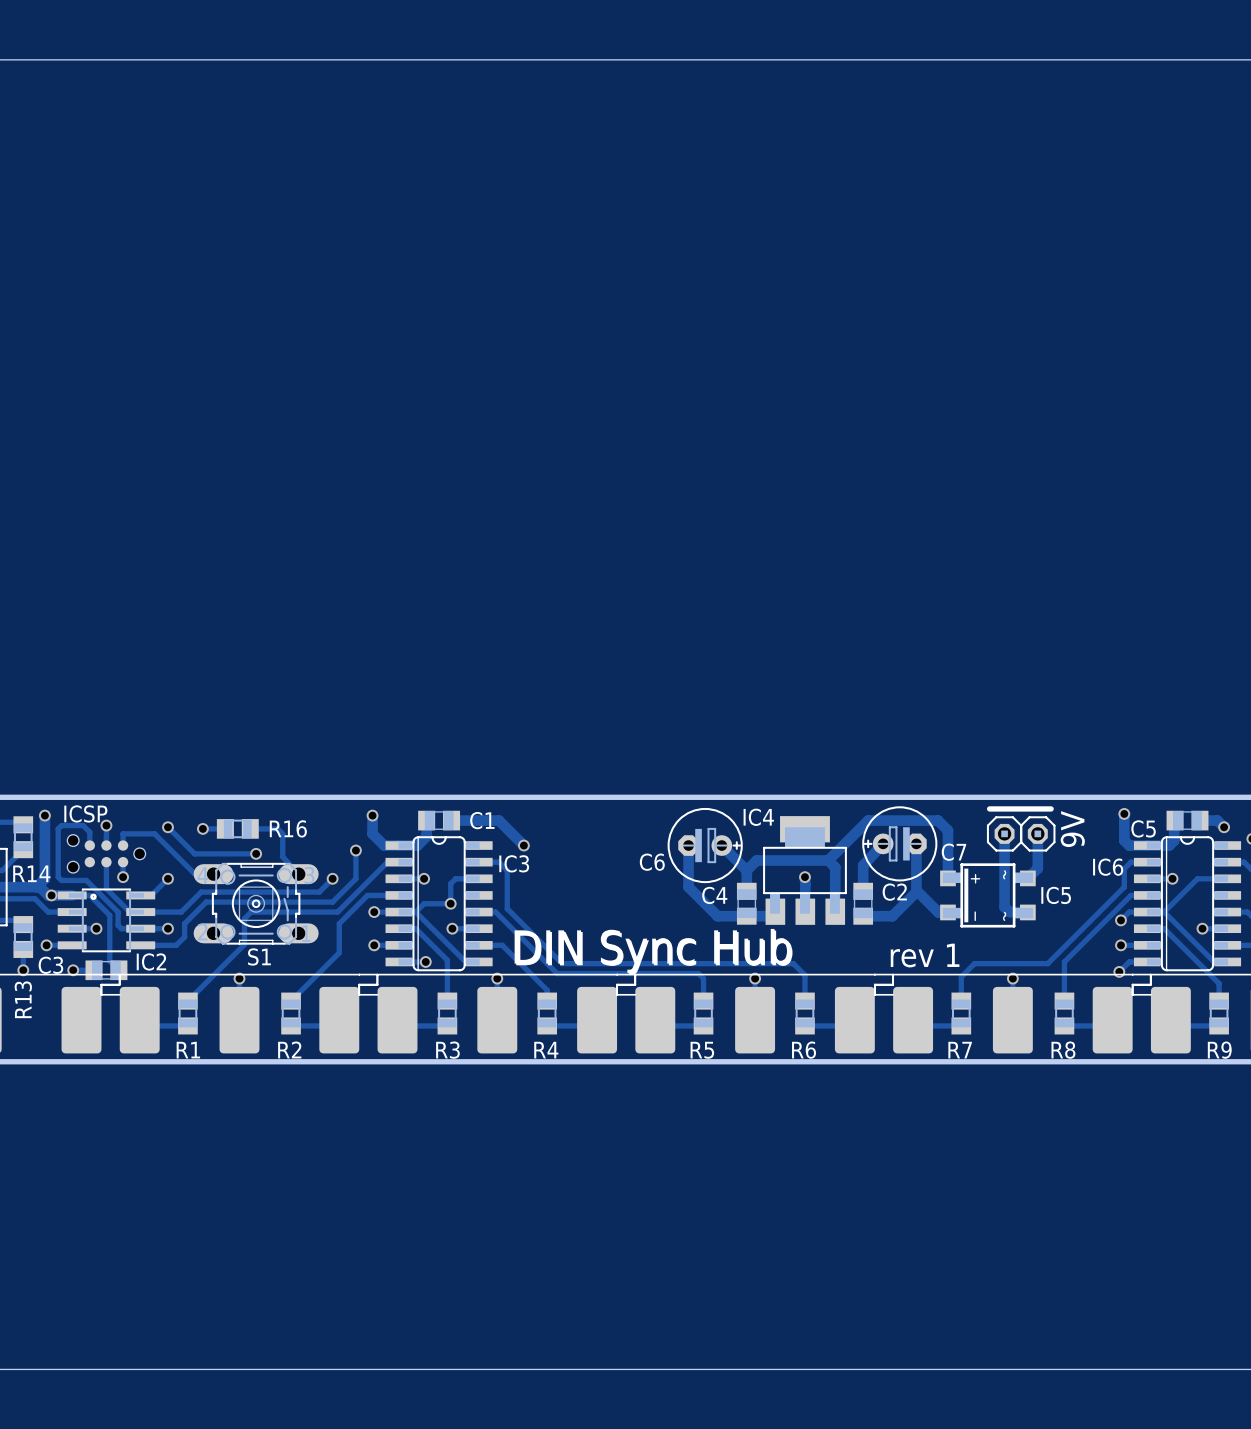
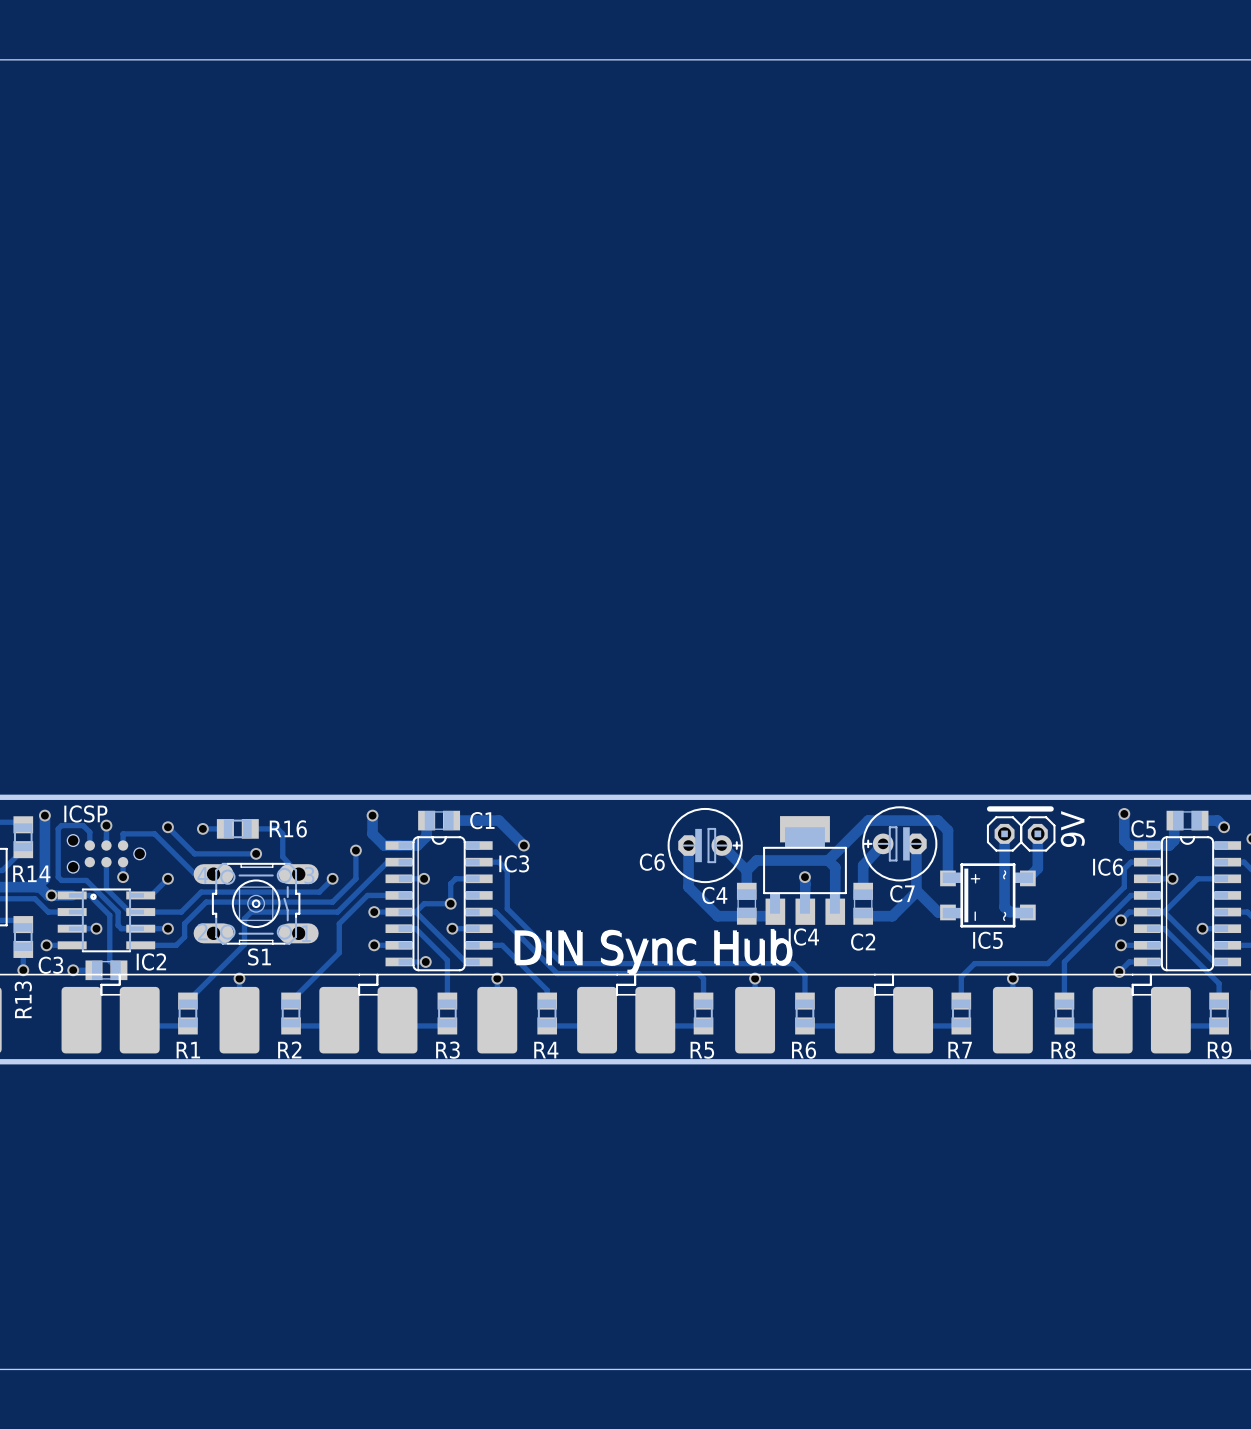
IC4 name position: IC4 (758, 817) -> IC4 (803, 937)
C7 name position: C7 (953, 852) -> C7 (902, 893)
C2 name position: C2 (894, 892) -> C2 (863, 942)
IC5 name position: IC5 (1056, 895) -> IC5 (987, 940)
text: rev 1 (925, 955) -> none

